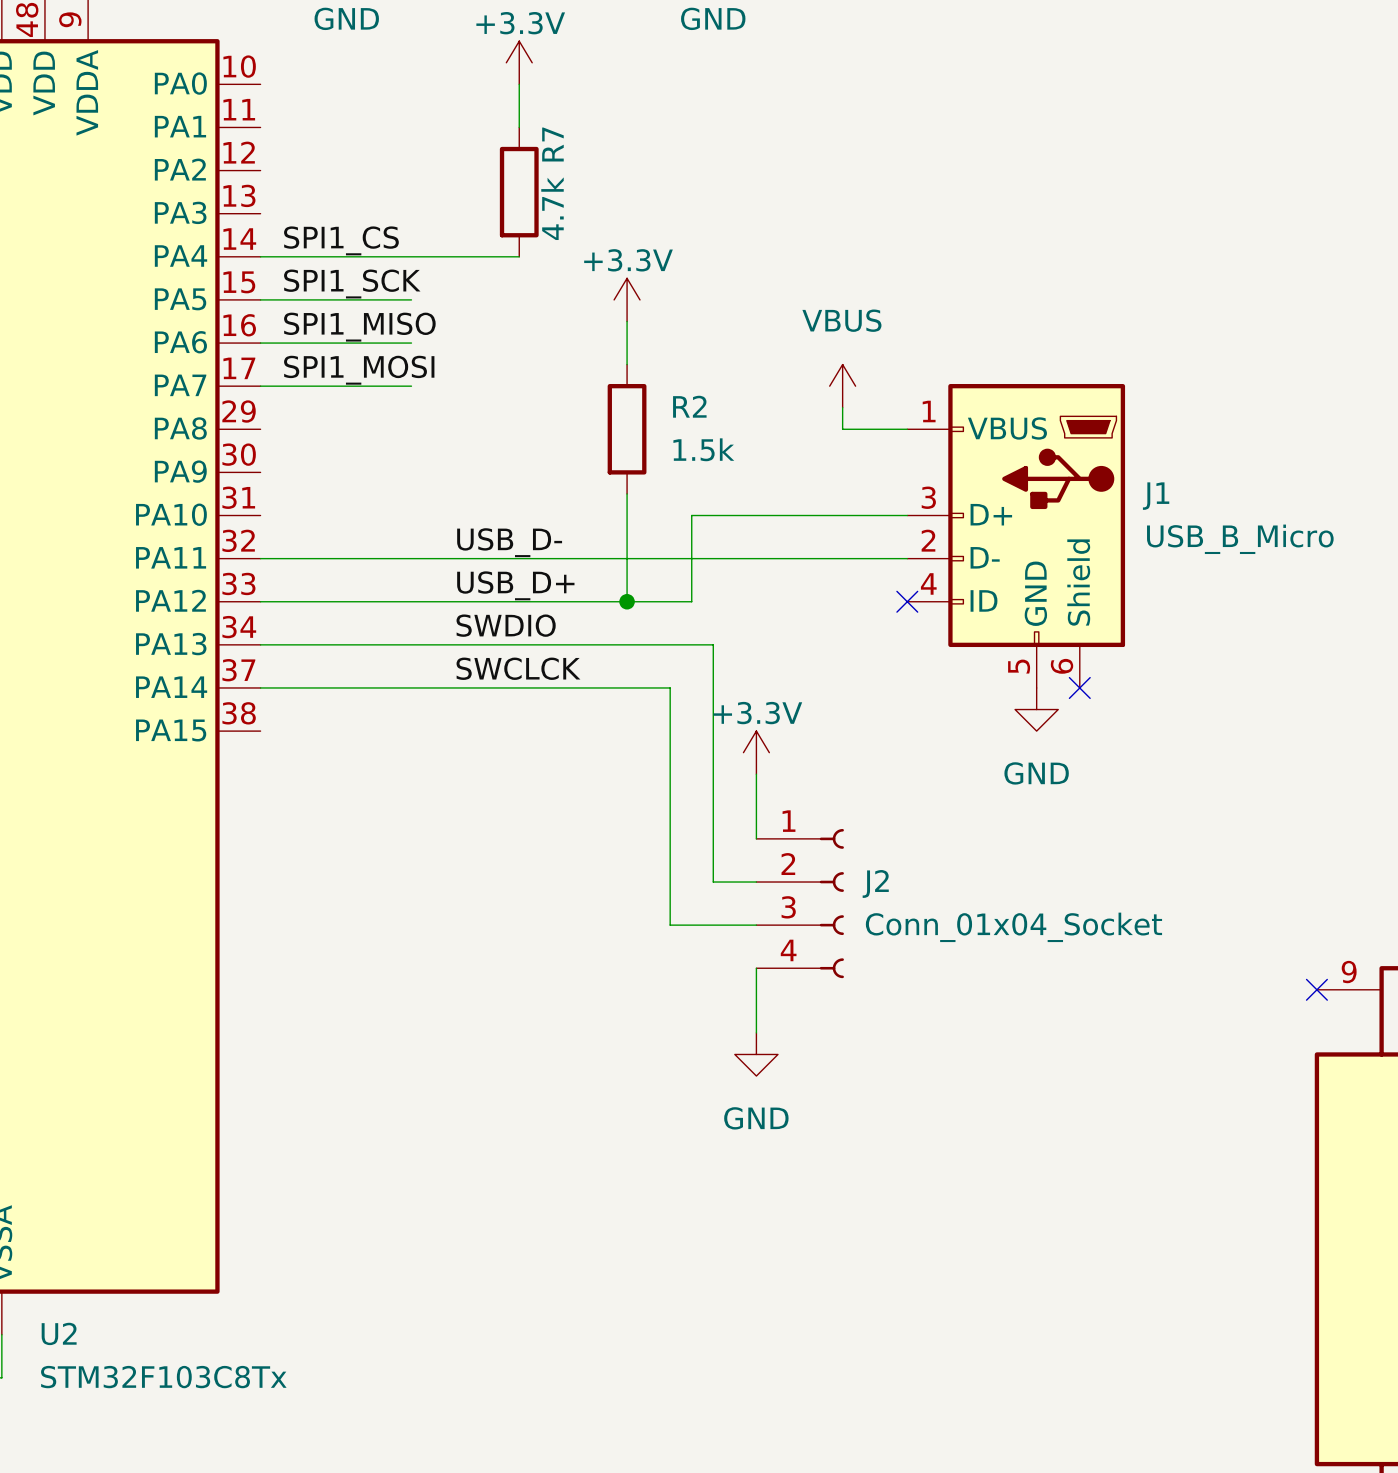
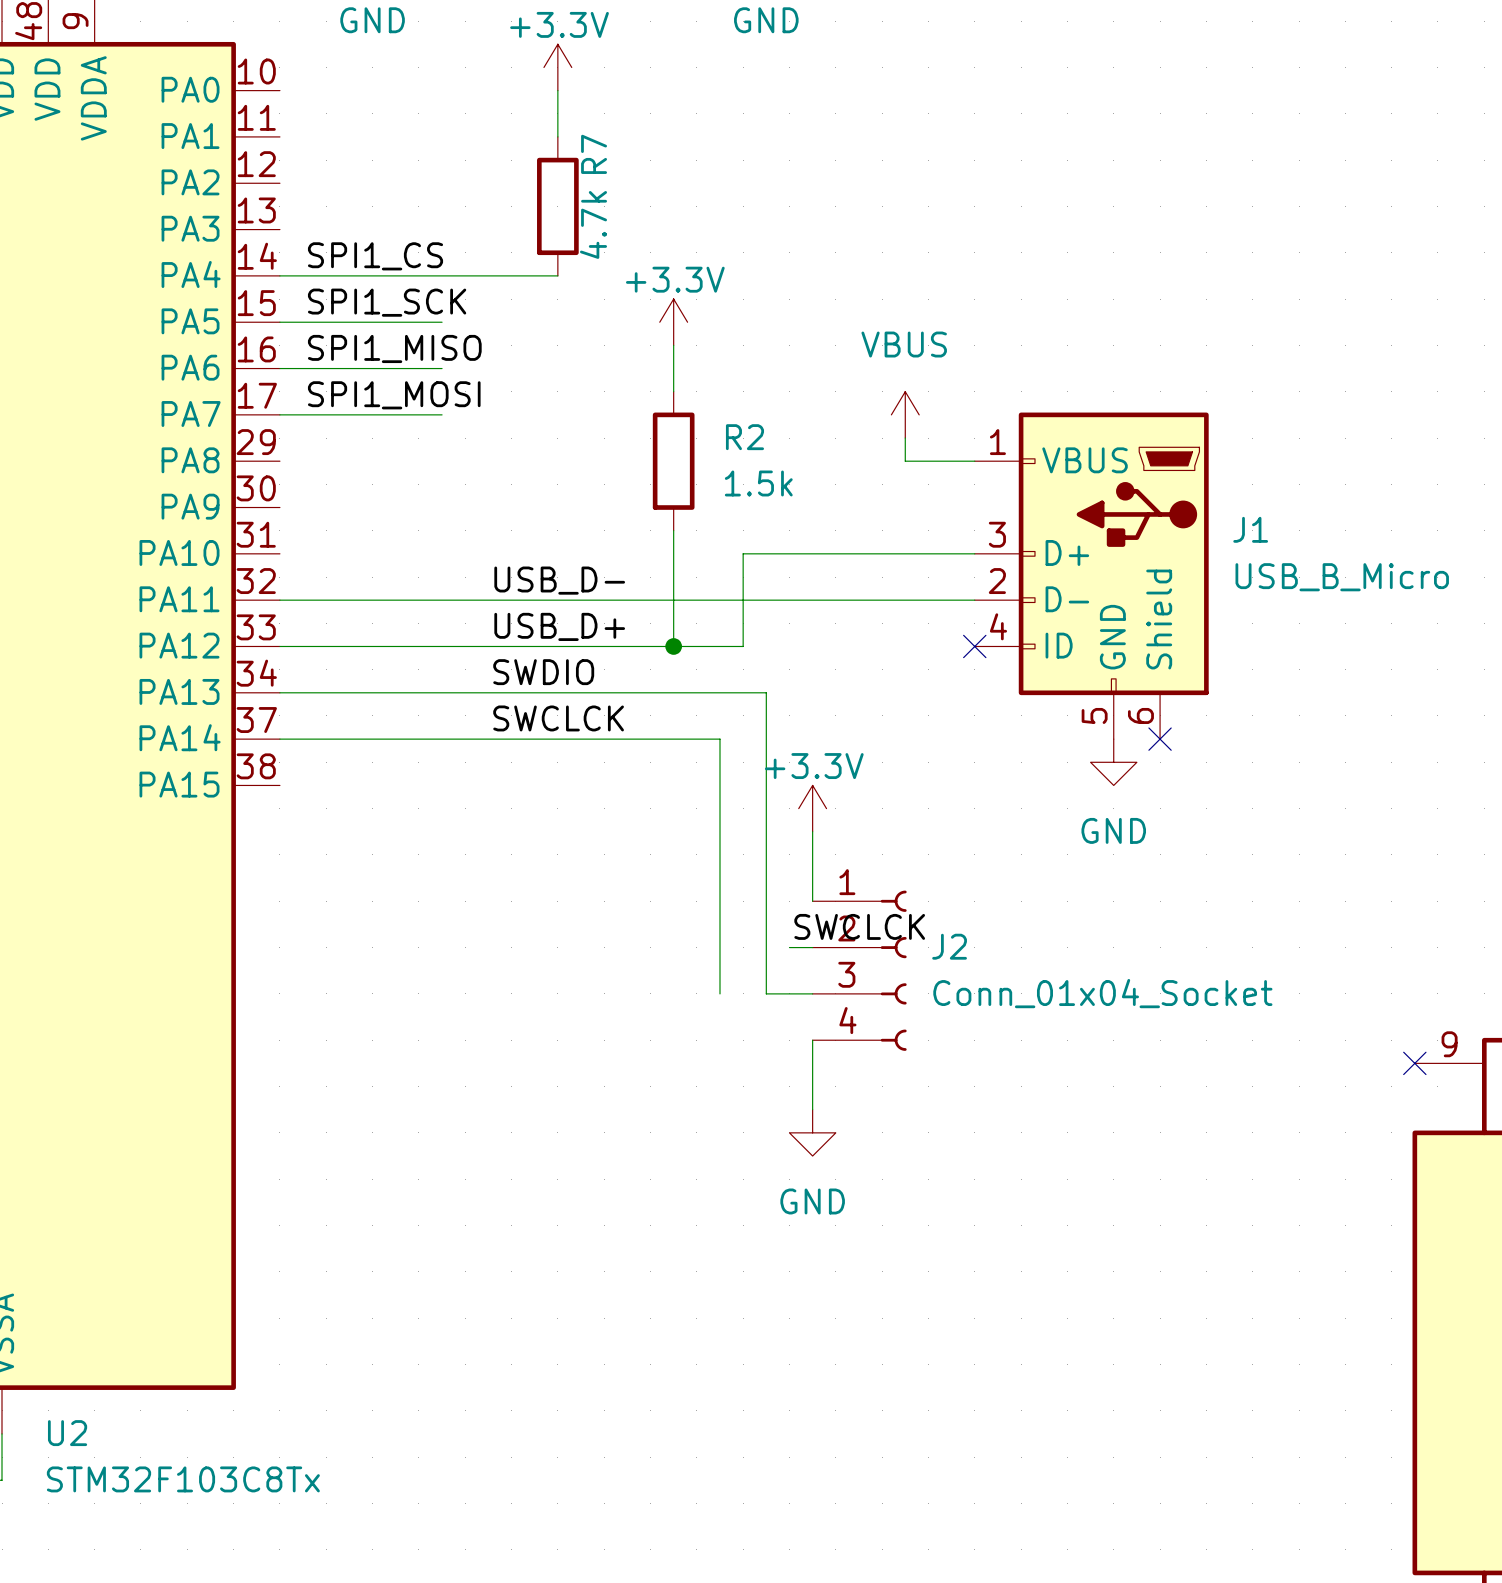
label: none -> SWCLCK (859, 926)
wire: (713, 882) (734, 882) -> (766, 947) (766, 993)
wire: (670, 925) (713, 925) -> none

